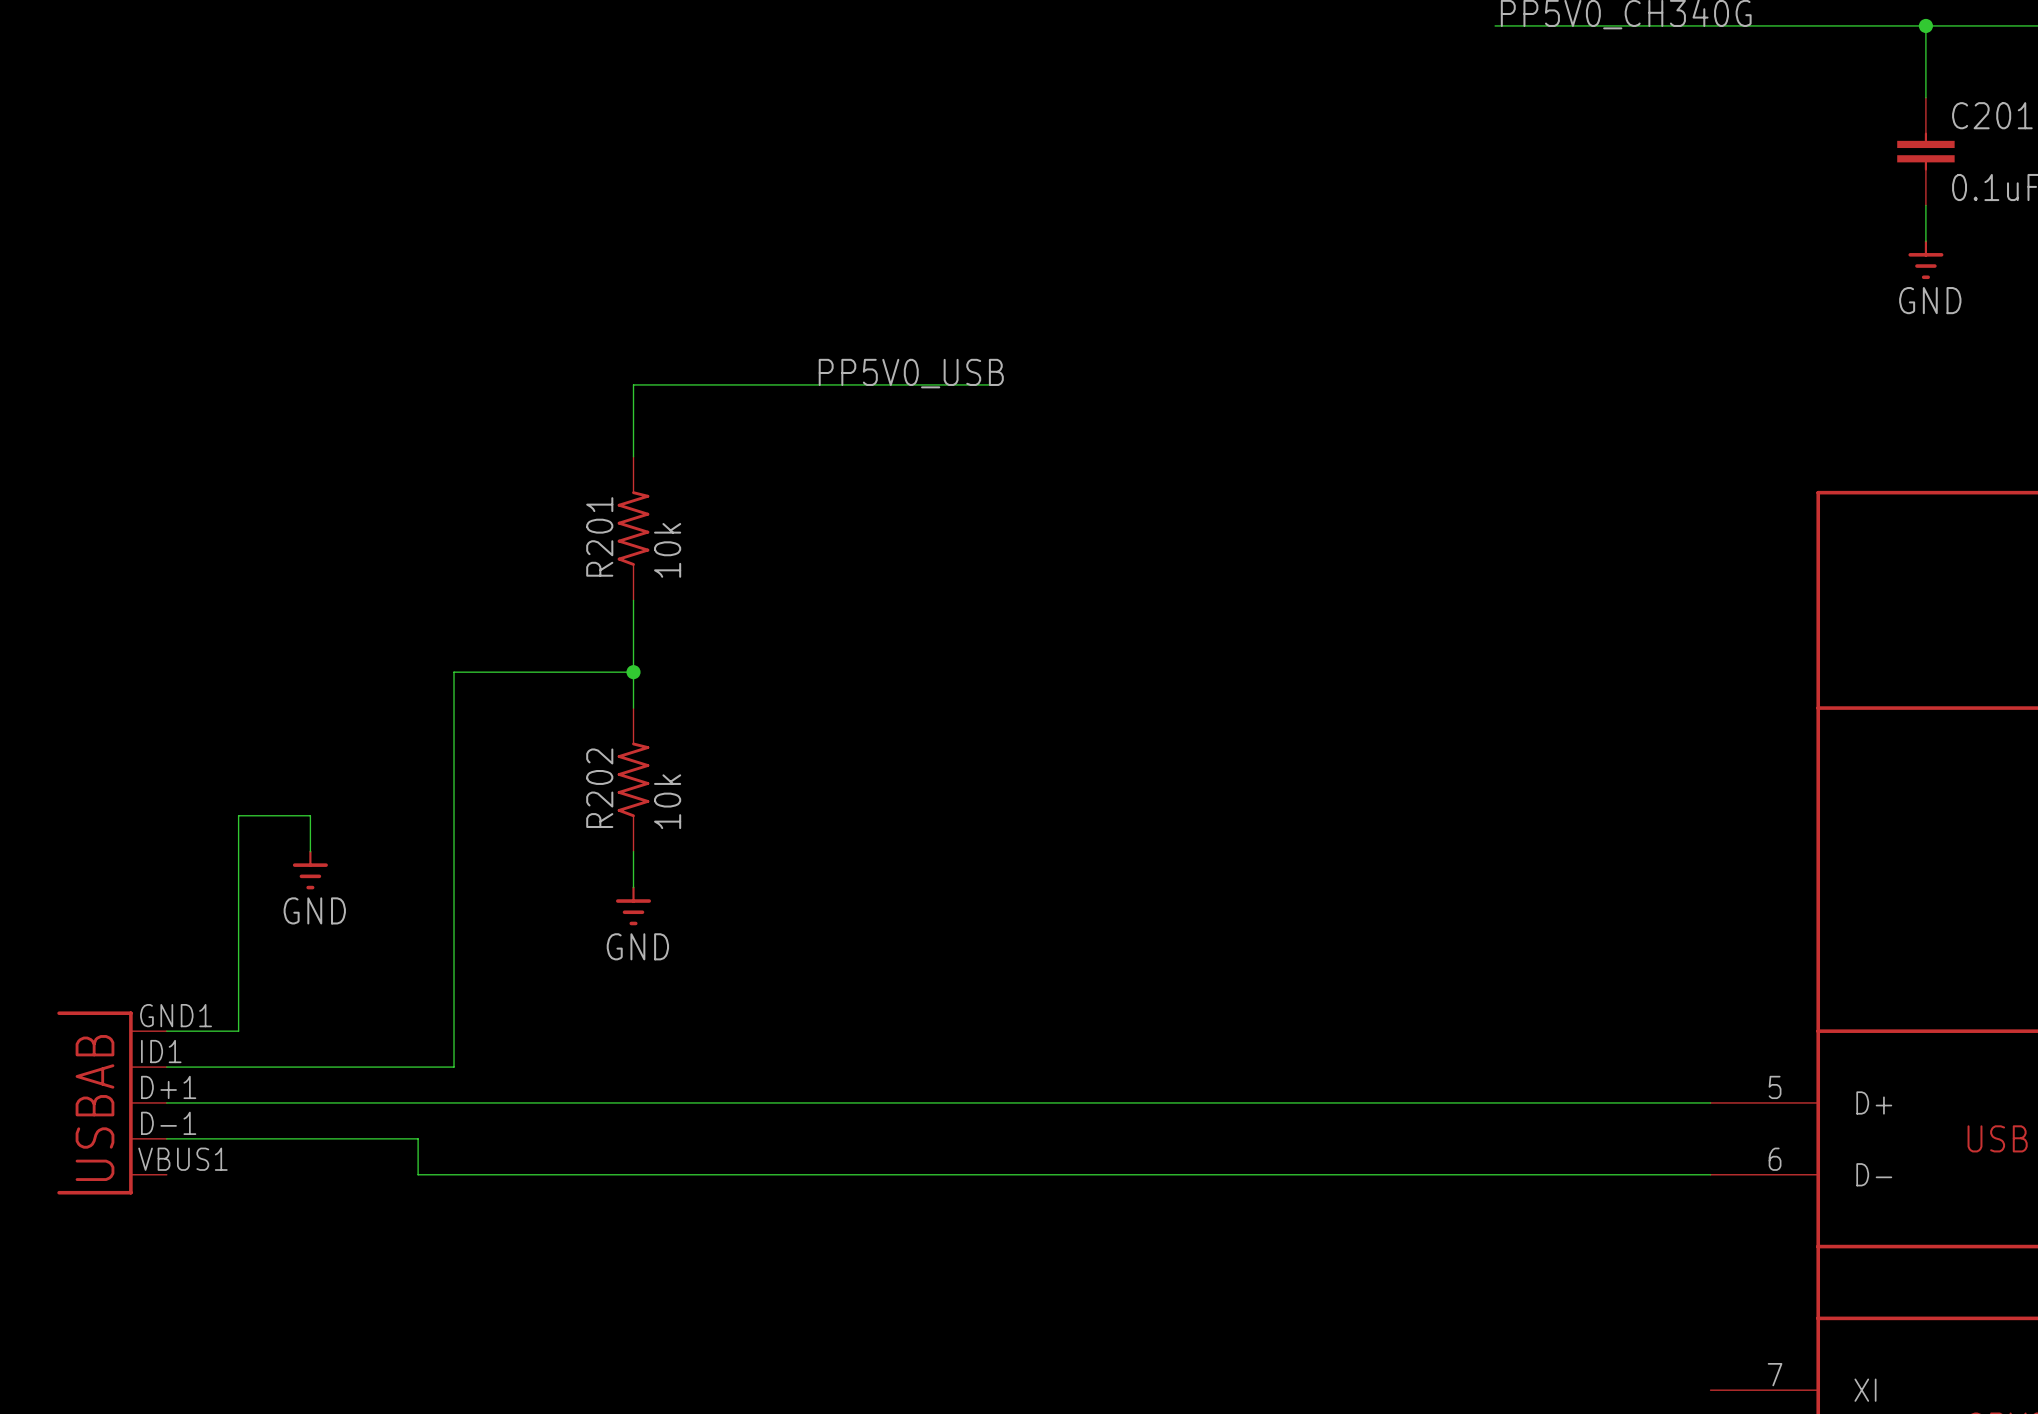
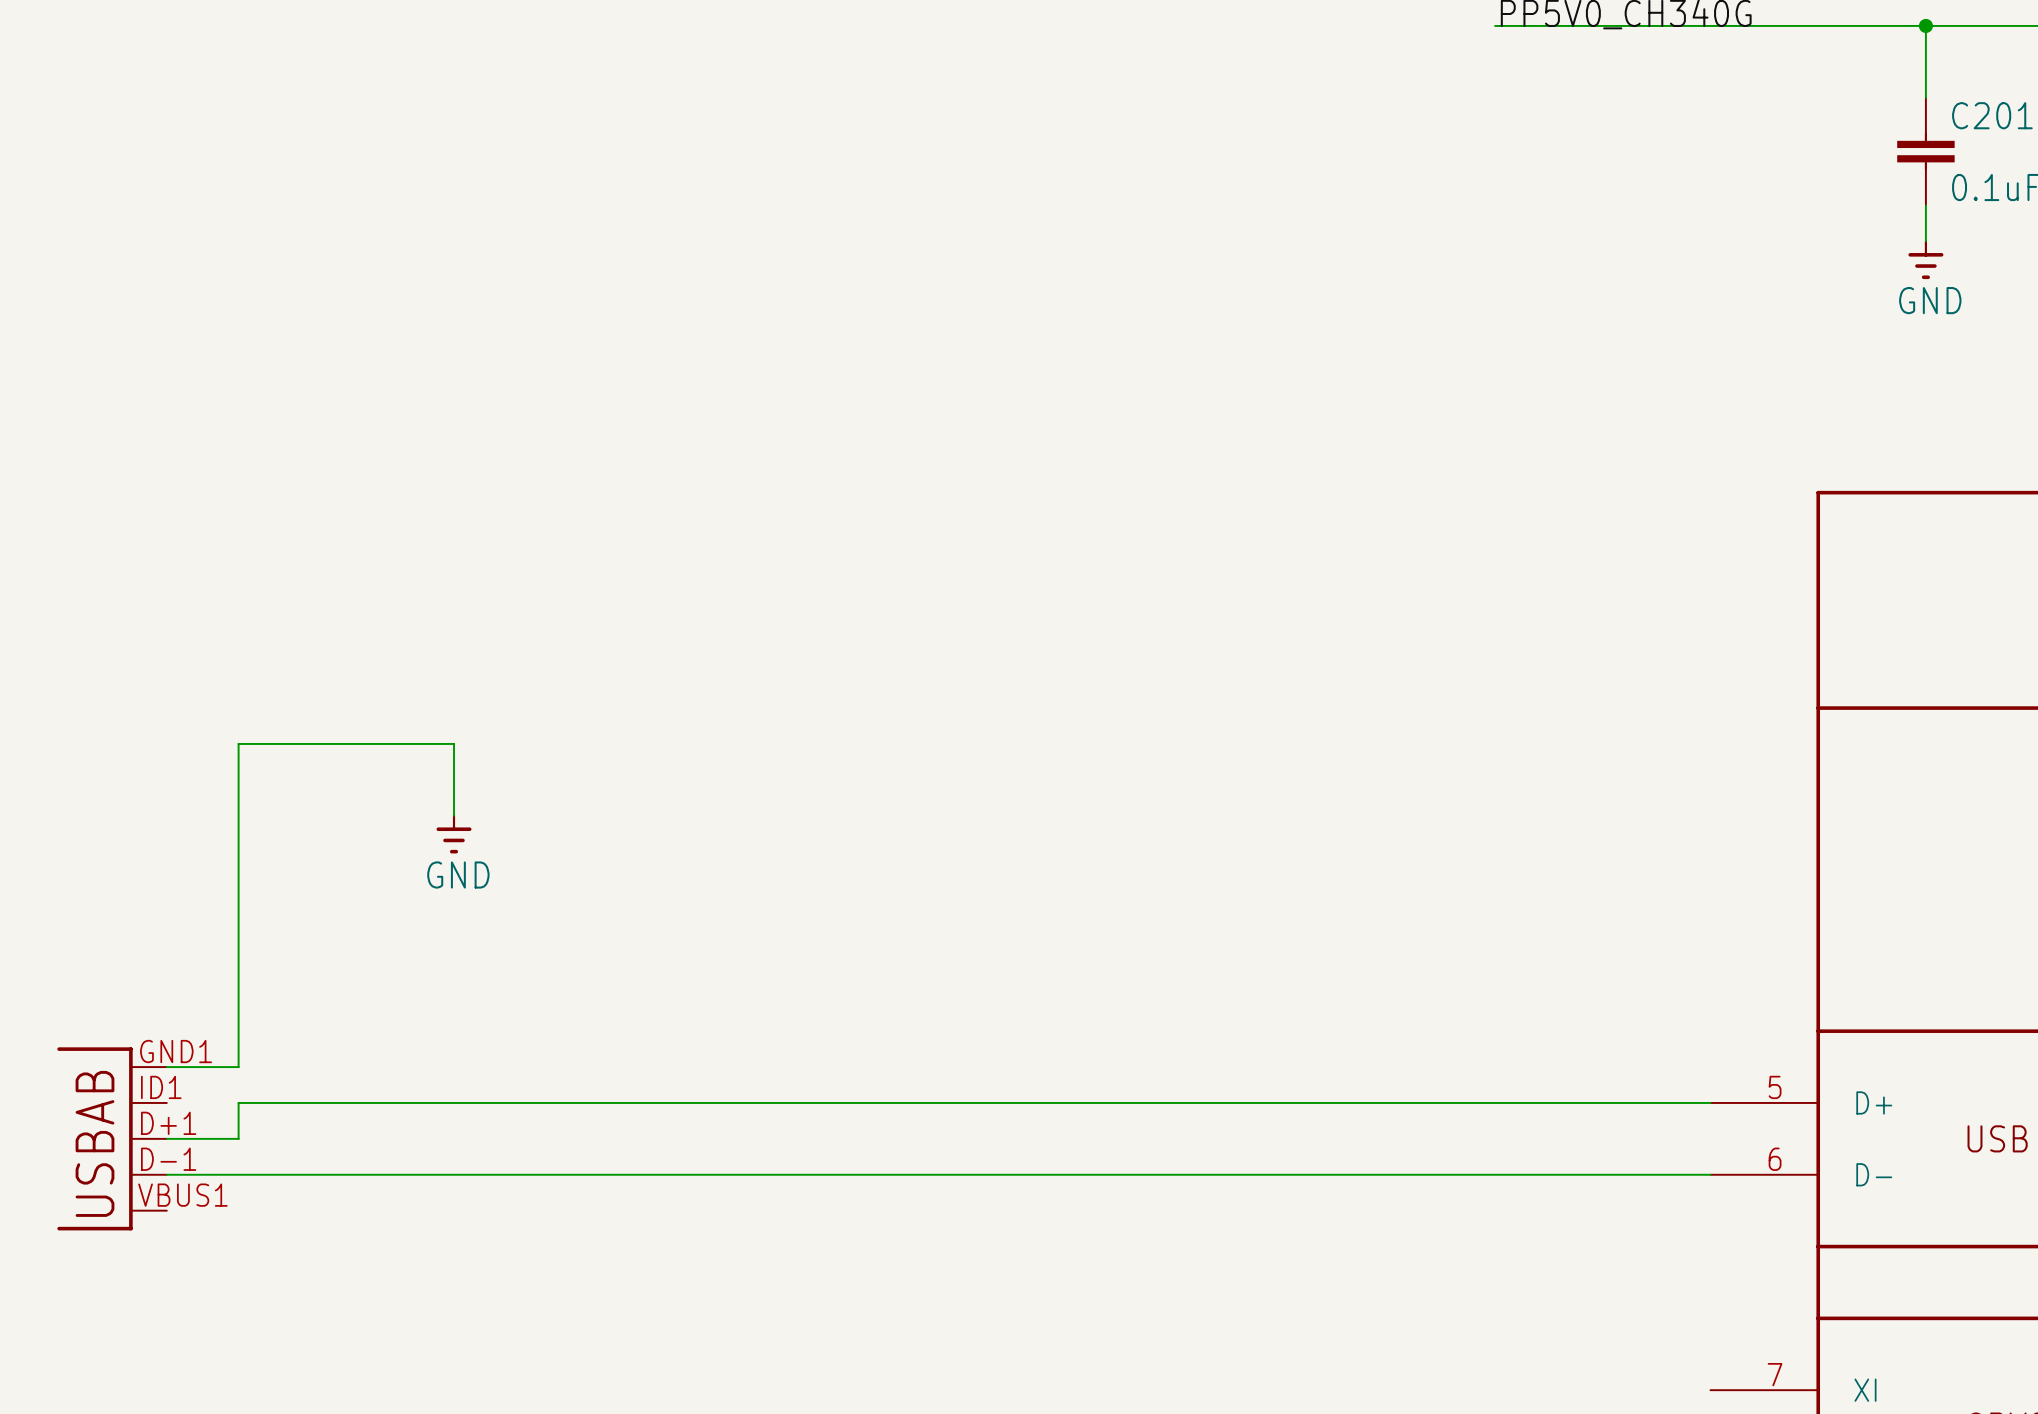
label: PP5V0_USB (911, 373) -> none
wire: (992, 384) (633, 384) (633, 456) -> none
R201: 10k (633, 528) -> none
wire: (633, 600) (633, 708) -> none
wire: (633, 672) (454, 672) (454, 743) -> none
junction: (633, 672) -> none
R202: 10k (633, 779) -> none
wire: (238, 815) (310, 815) (310, 851) -> (238, 815) (238, 743) (454, 743)
wire: (454, 815) (454, 1067) (238, 1067) -> none
power symbol: none -> GND (454, 834)
wire: (633, 851) (633, 887) -> none
power symbol: GND (310, 869) -> none
power symbol: GND (633, 905) -> none
wire: (166, 1031) (238, 1031) -> (238, 1067) (238, 1031)
part position: (112, 1102) -> (112, 1138)
wire: (166, 1102) (238, 1102) -> (238, 1138) (238, 1102)
wire: (238, 1138) (418, 1138) (418, 1174) -> (166, 1174) (418, 1174)

